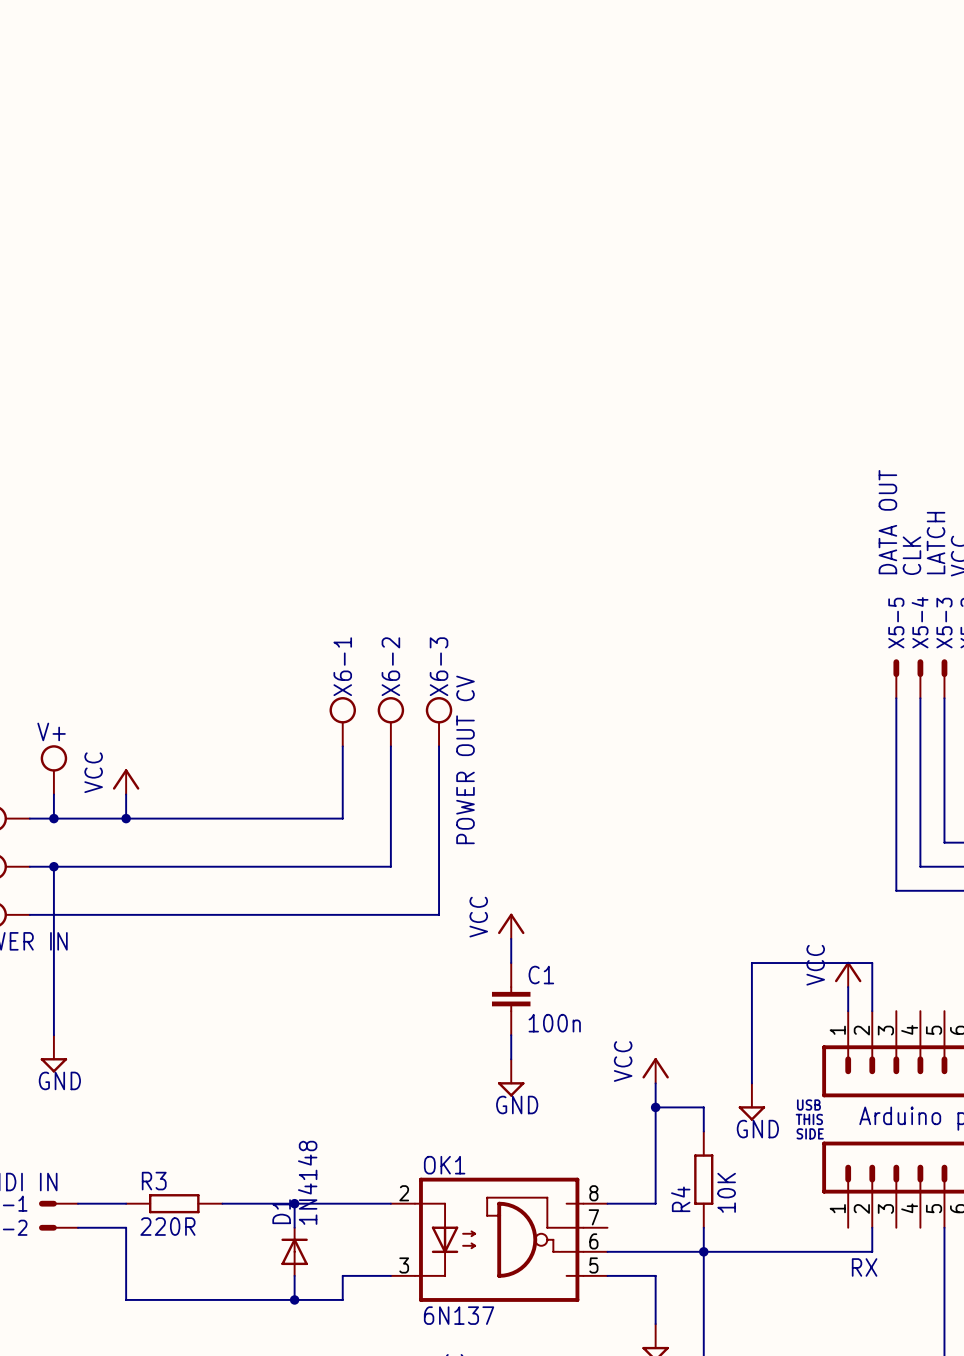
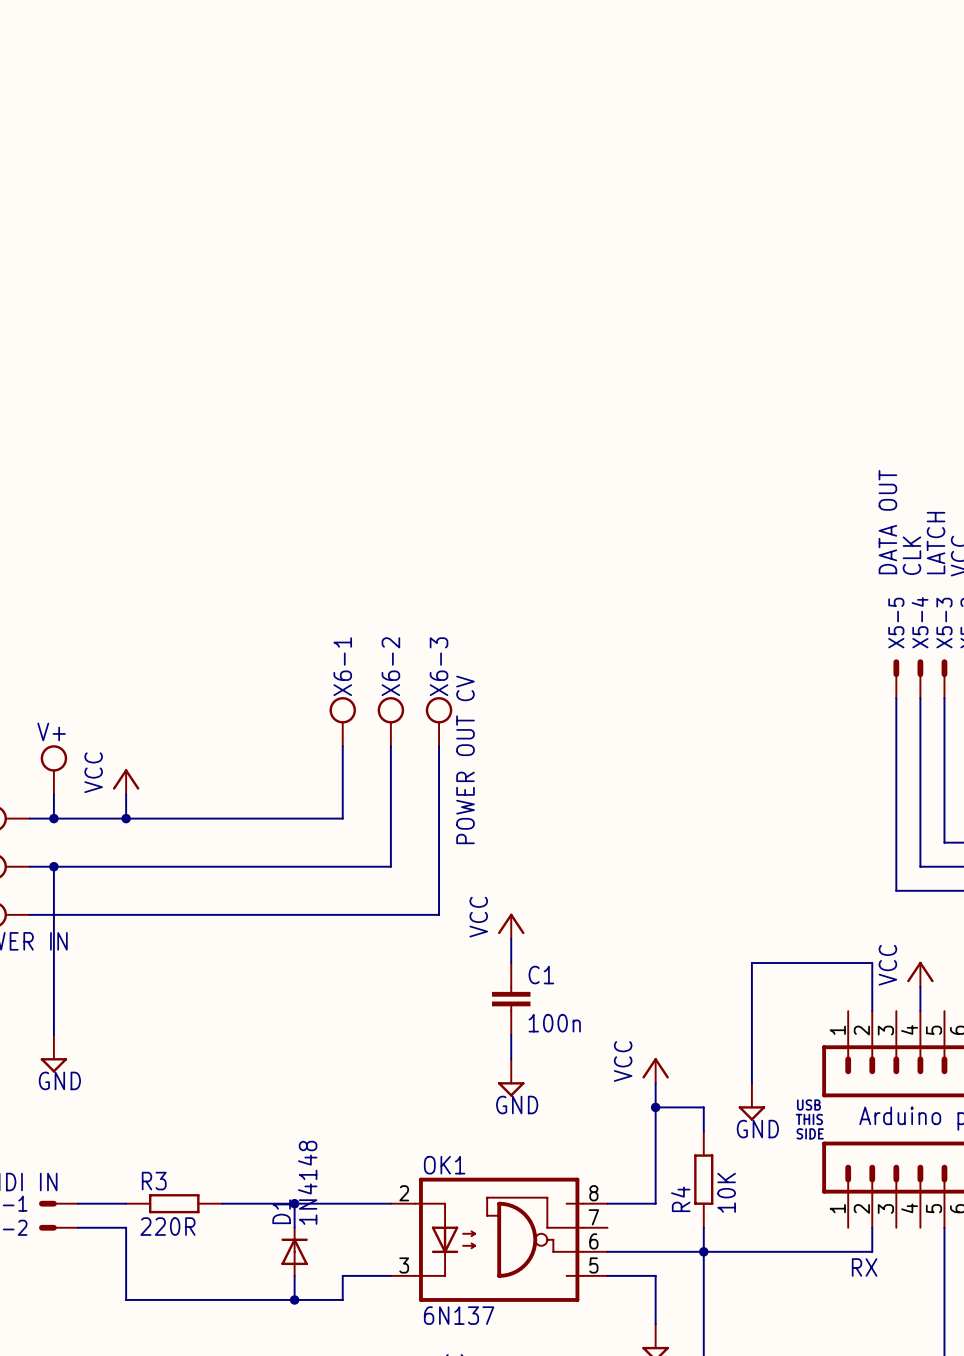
power symbol position: VCC (848, 974) -> VCC (920, 974)
wire: (848, 987) (848, 1011) -> (920, 987) (920, 1011)

